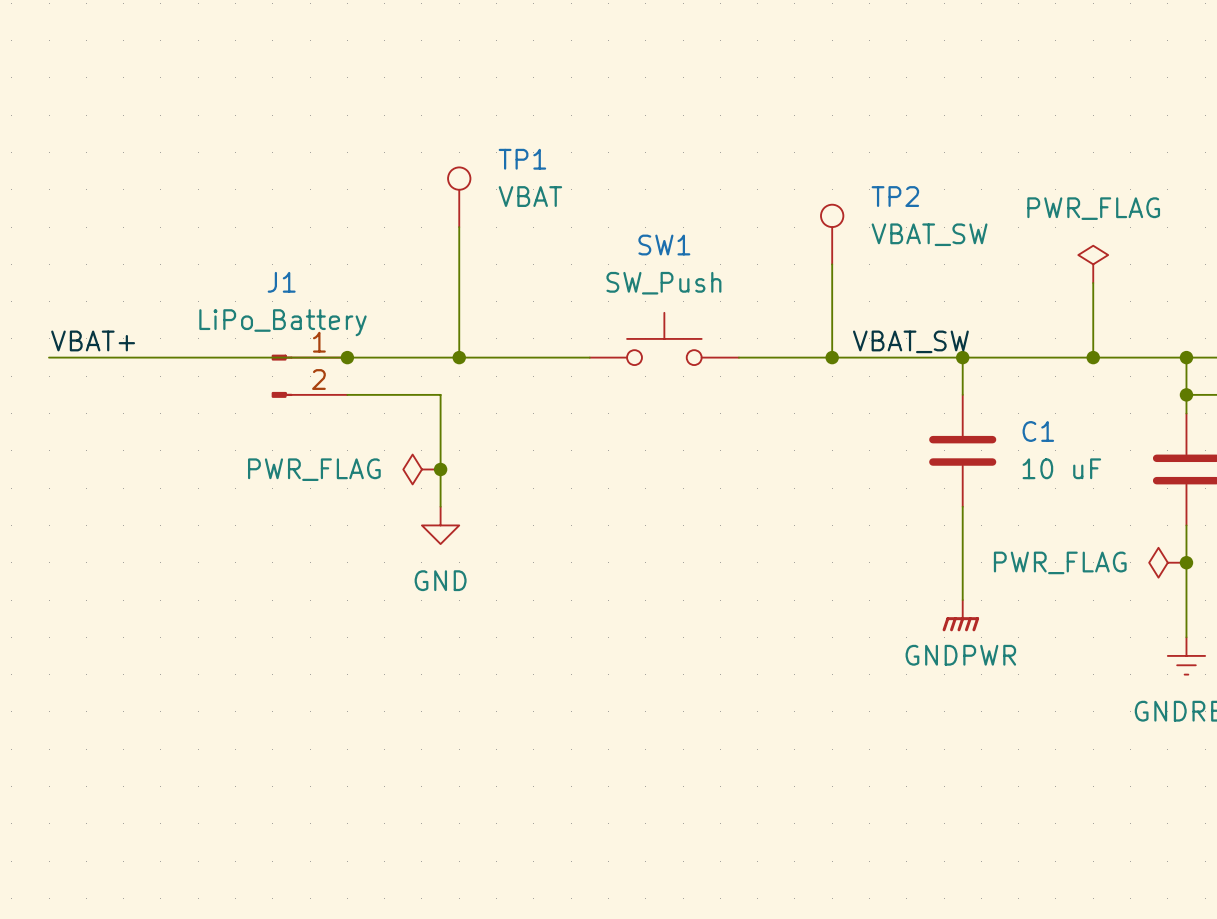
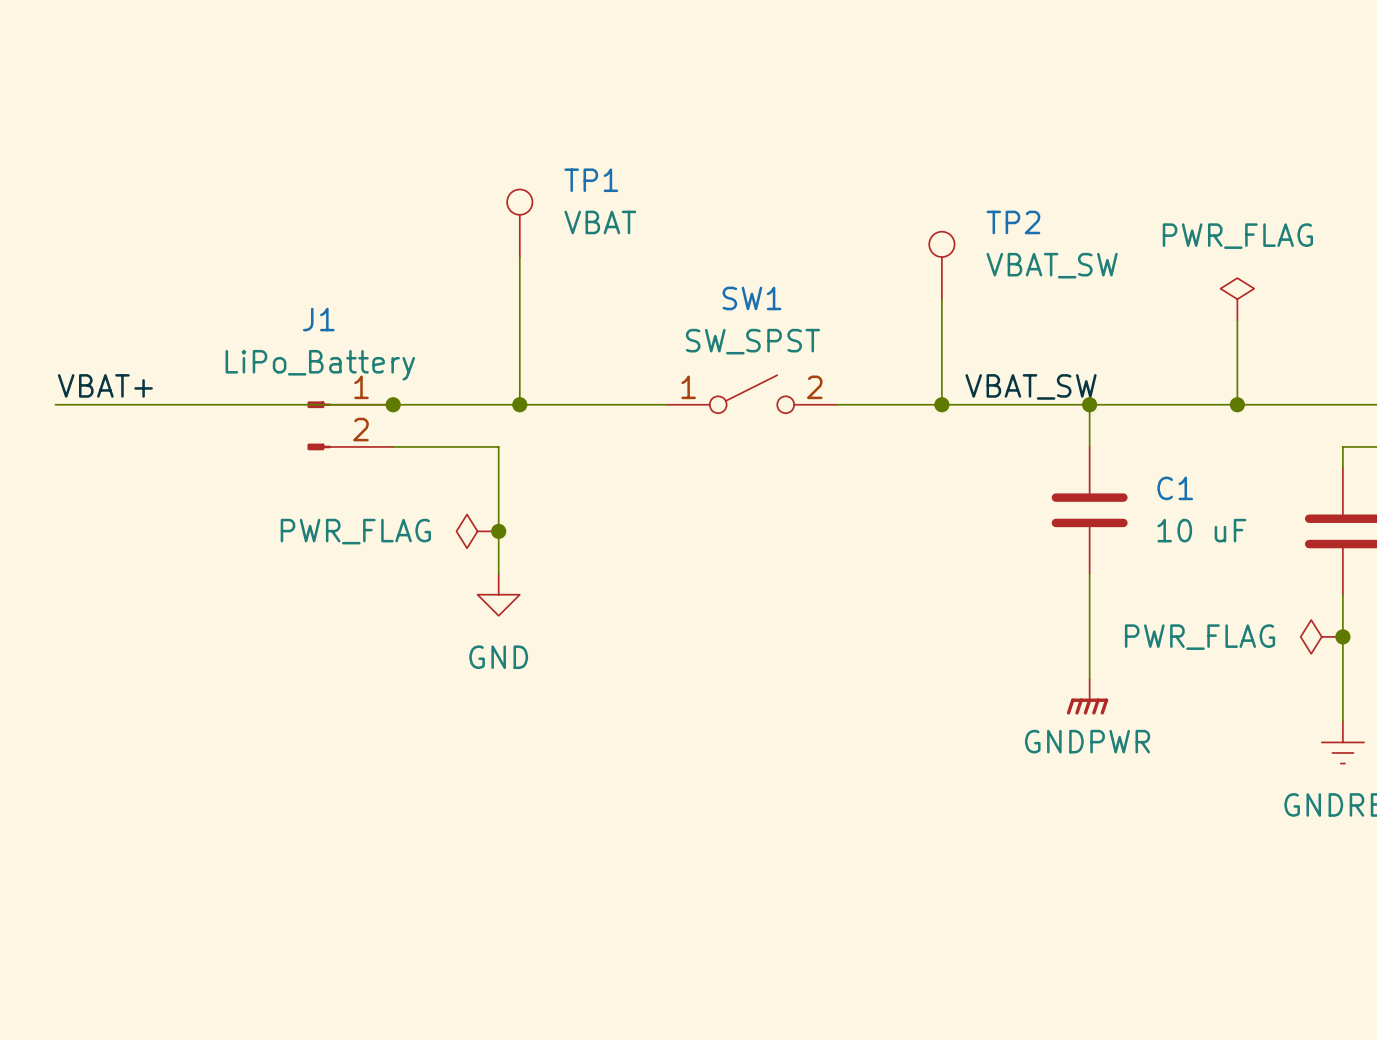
SW1 value: SW_Push (663, 283) -> SW_SPST (752, 341)
SW1 symbol: [589, 312, 739, 366] -> [667, 375, 837, 414]
wire: (1186, 357) (1186, 394) -> none
junction: (1186, 357) -> none
junction: (1186, 394) -> none

